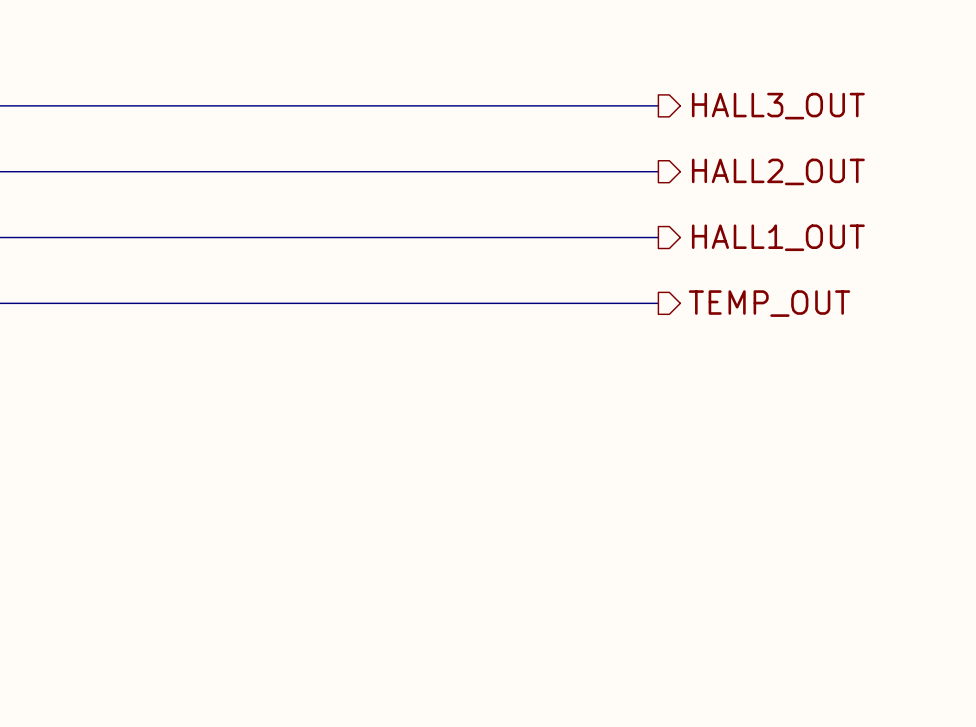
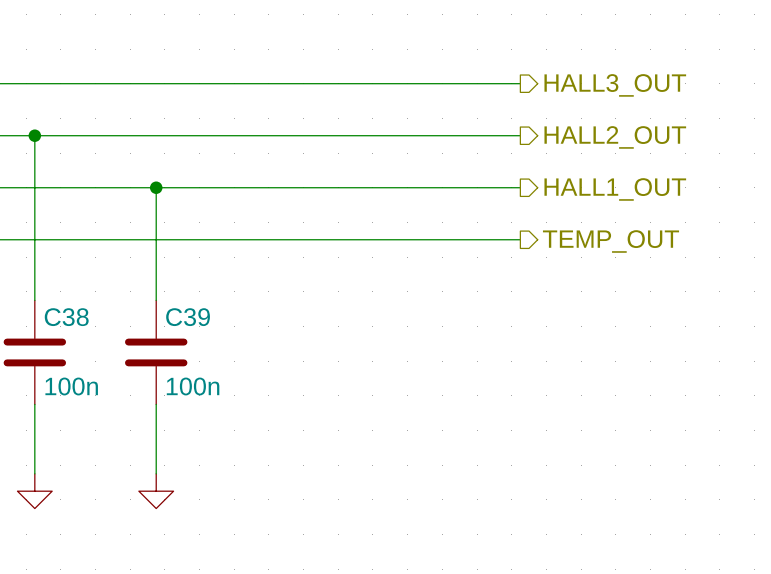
wire: none -> (34, 135) (34, 300)
junction: none -> (34, 135)
wire: none -> (156, 187) (156, 300)
junction: none -> (156, 187)
C38: none -> 100n (34, 352)
C39: none -> 100n (156, 352)
wire: none -> (34, 404) (34, 473)
wire: none -> (156, 404) (156, 473)
power symbol: none -> (34, 491)
power symbol: none -> (156, 491)

